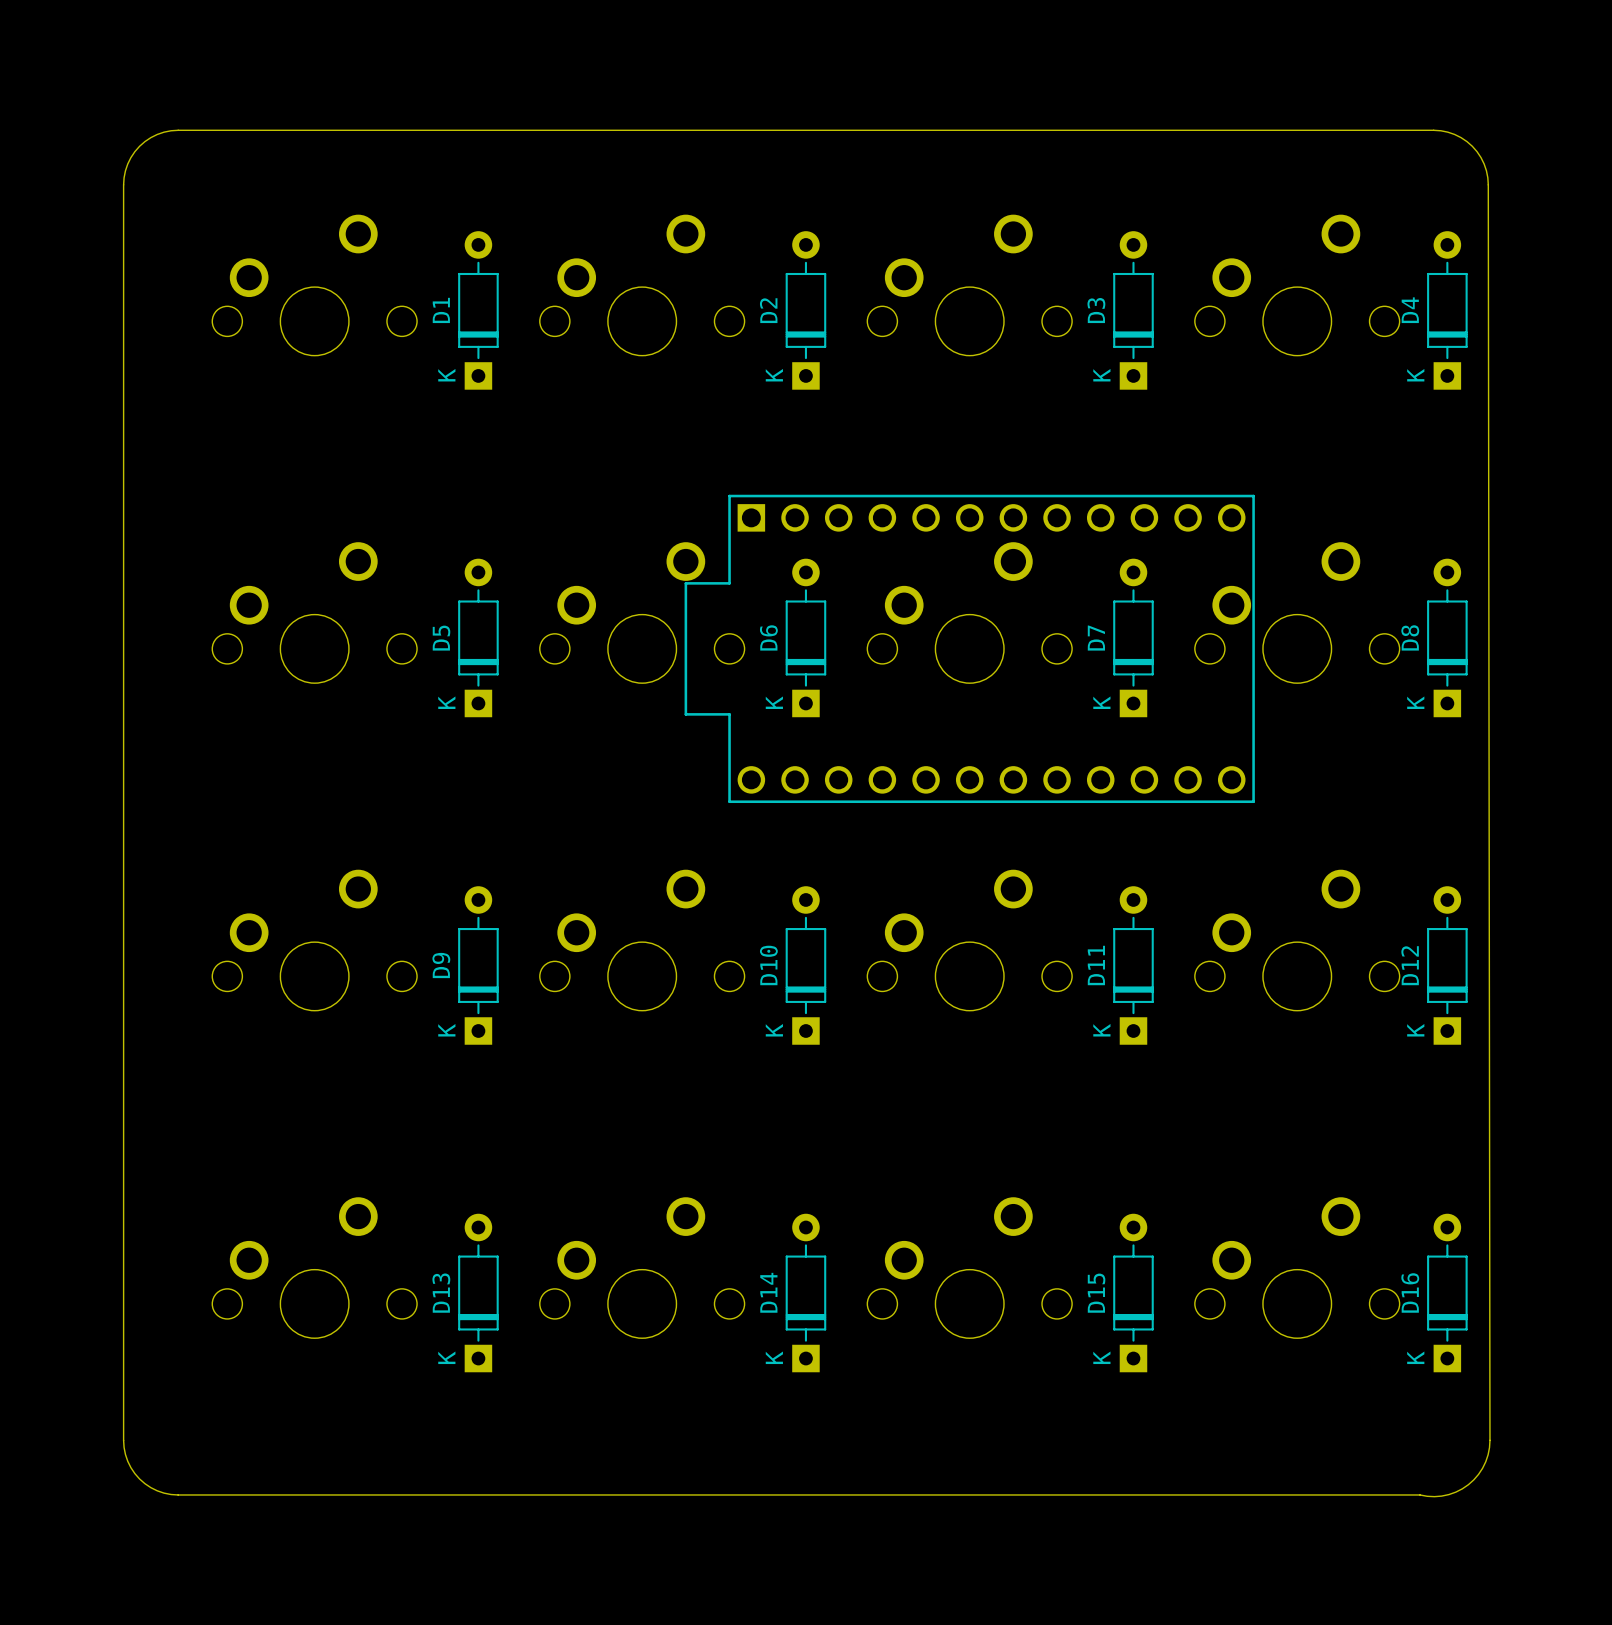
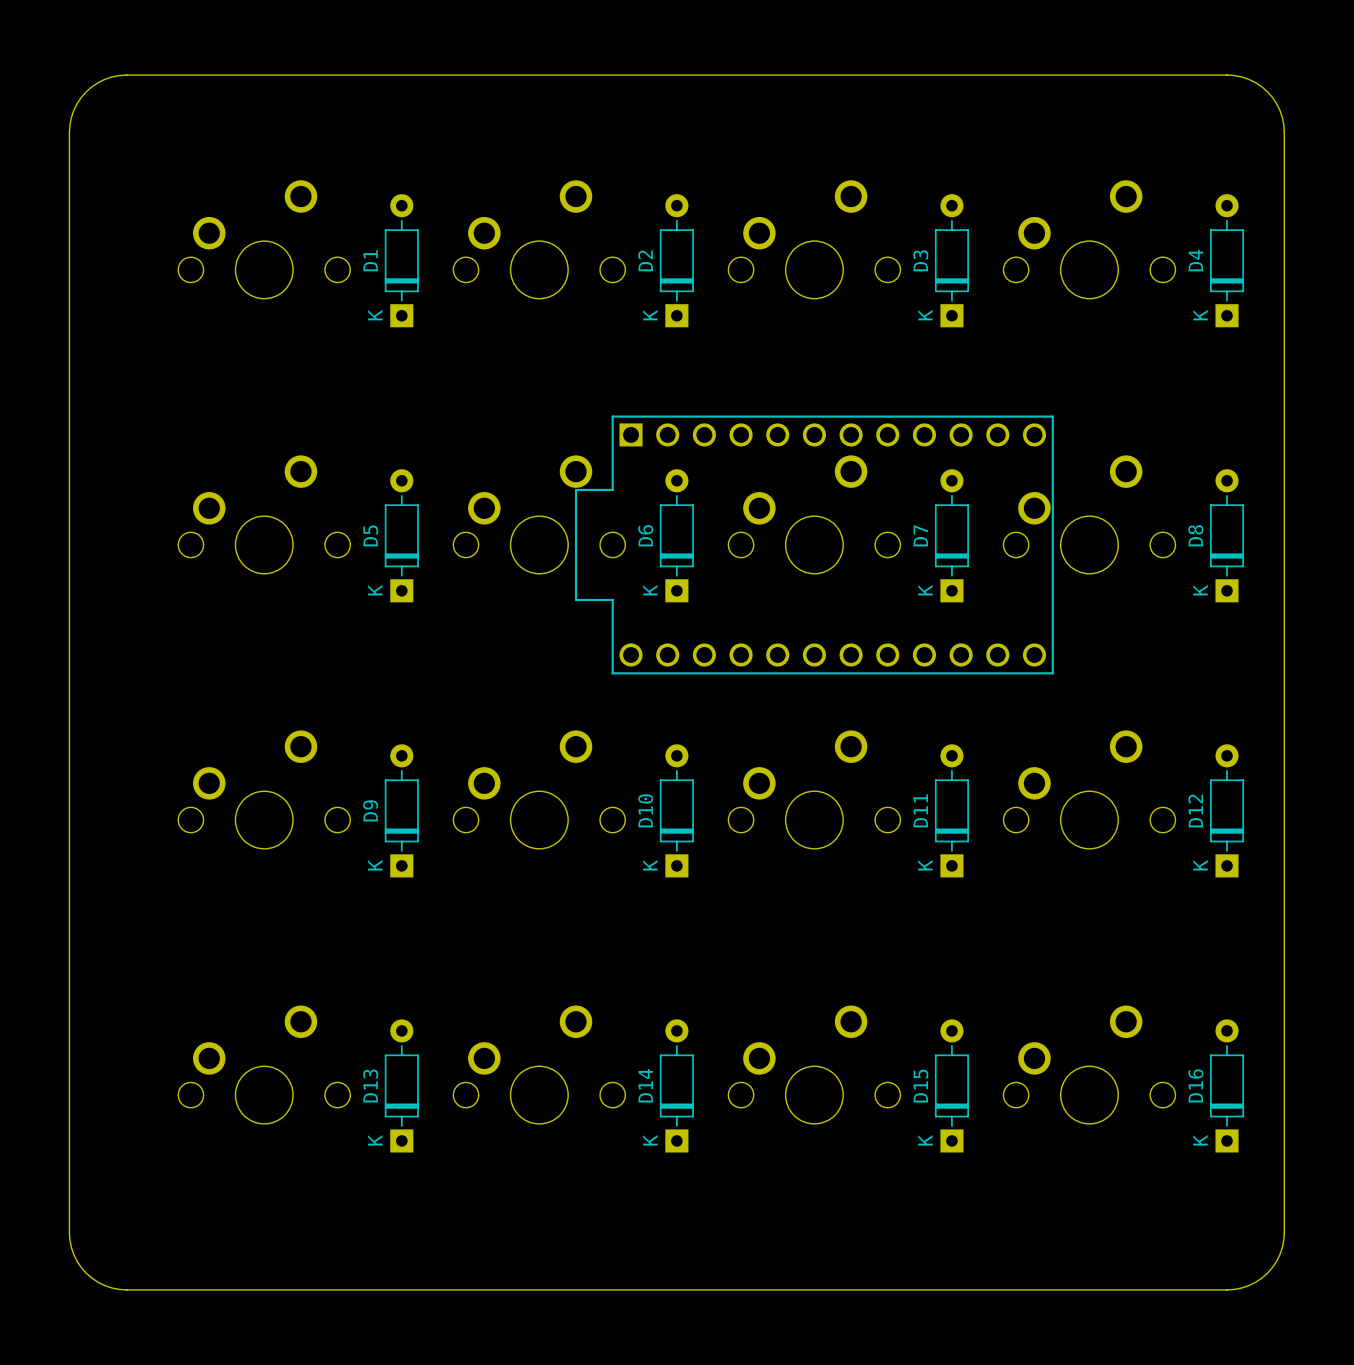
board edge: (178, 130) (1433, 130) (1454, 134) (1472, 146) (1484, 163) (1488, 184) (1489, 1440) (1485, 1461) (1473, 1479) (1455, 1492) (1434, 1496) (1420, 1494) (178, 1494) (157, 1490) (139, 1479) (127, 1461) (123, 1440) (123, 184) (127, 163) (139, 146) (157, 134) (178, 130) -> (126, 75) (104, 79) (86, 91) (73, 110) (69, 132) (69, 1232) (73, 1254) (86, 1273) (104, 1285) (126, 1289) (1227, 1289) (1248, 1285) (1267, 1273) (1279, 1254) (1284, 1232) (1284, 132) (1279, 110) (1267, 91) (1248, 79) (1227, 75) (126, 75)
D4 footprint: [1427, 231, 1468, 390] -> [1209, 194, 1245, 328]
D8 footprint: [1427, 558, 1468, 718] -> [1209, 469, 1245, 603]
D12 footprint: [1427, 886, 1468, 1045] -> [1209, 744, 1245, 878]
D16 footprint: [1427, 1213, 1468, 1373] -> [1209, 1019, 1245, 1153]

